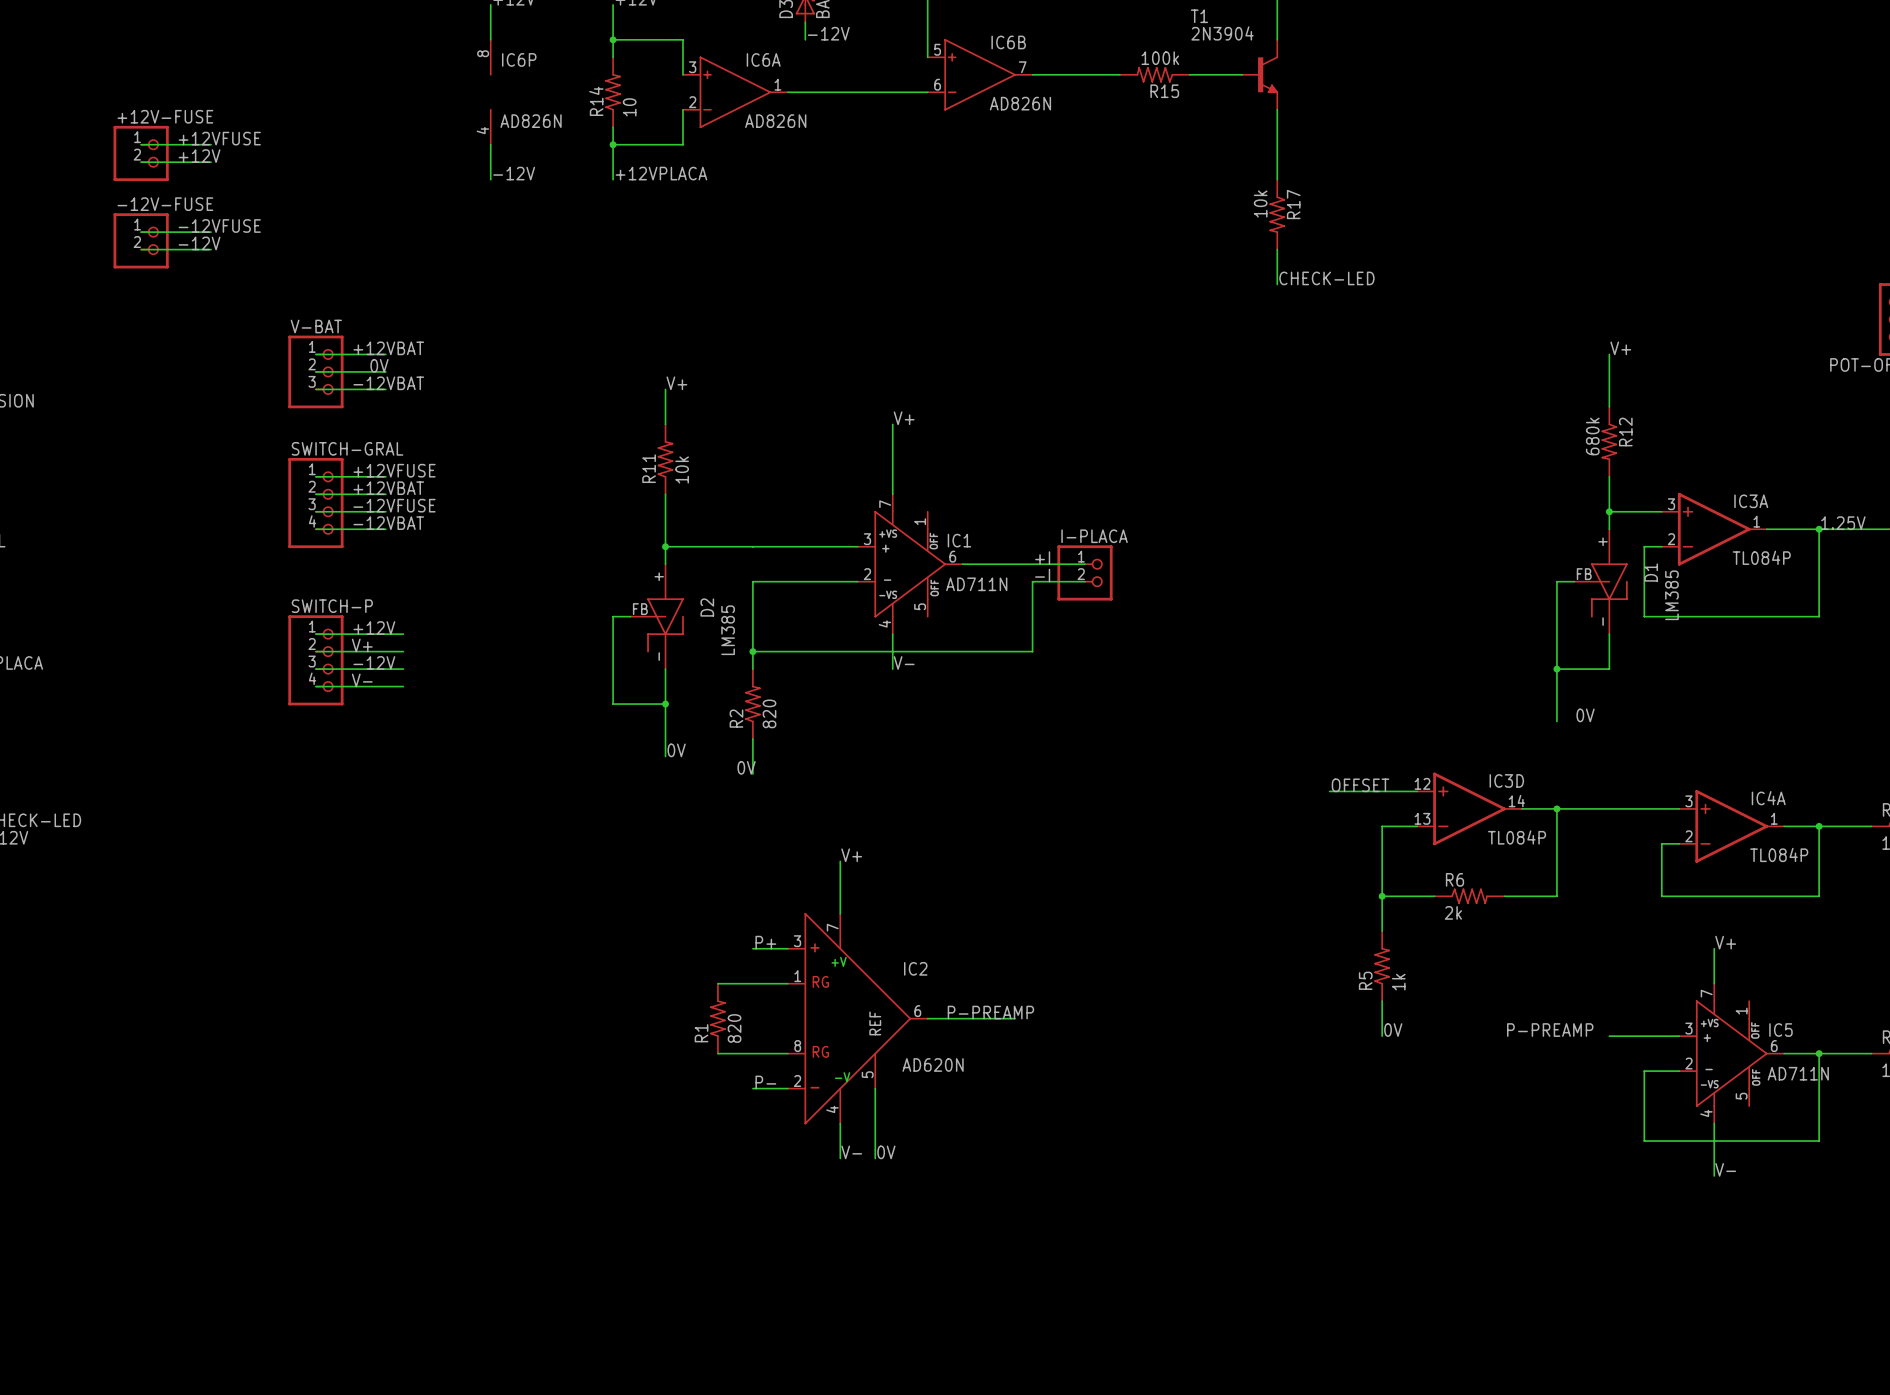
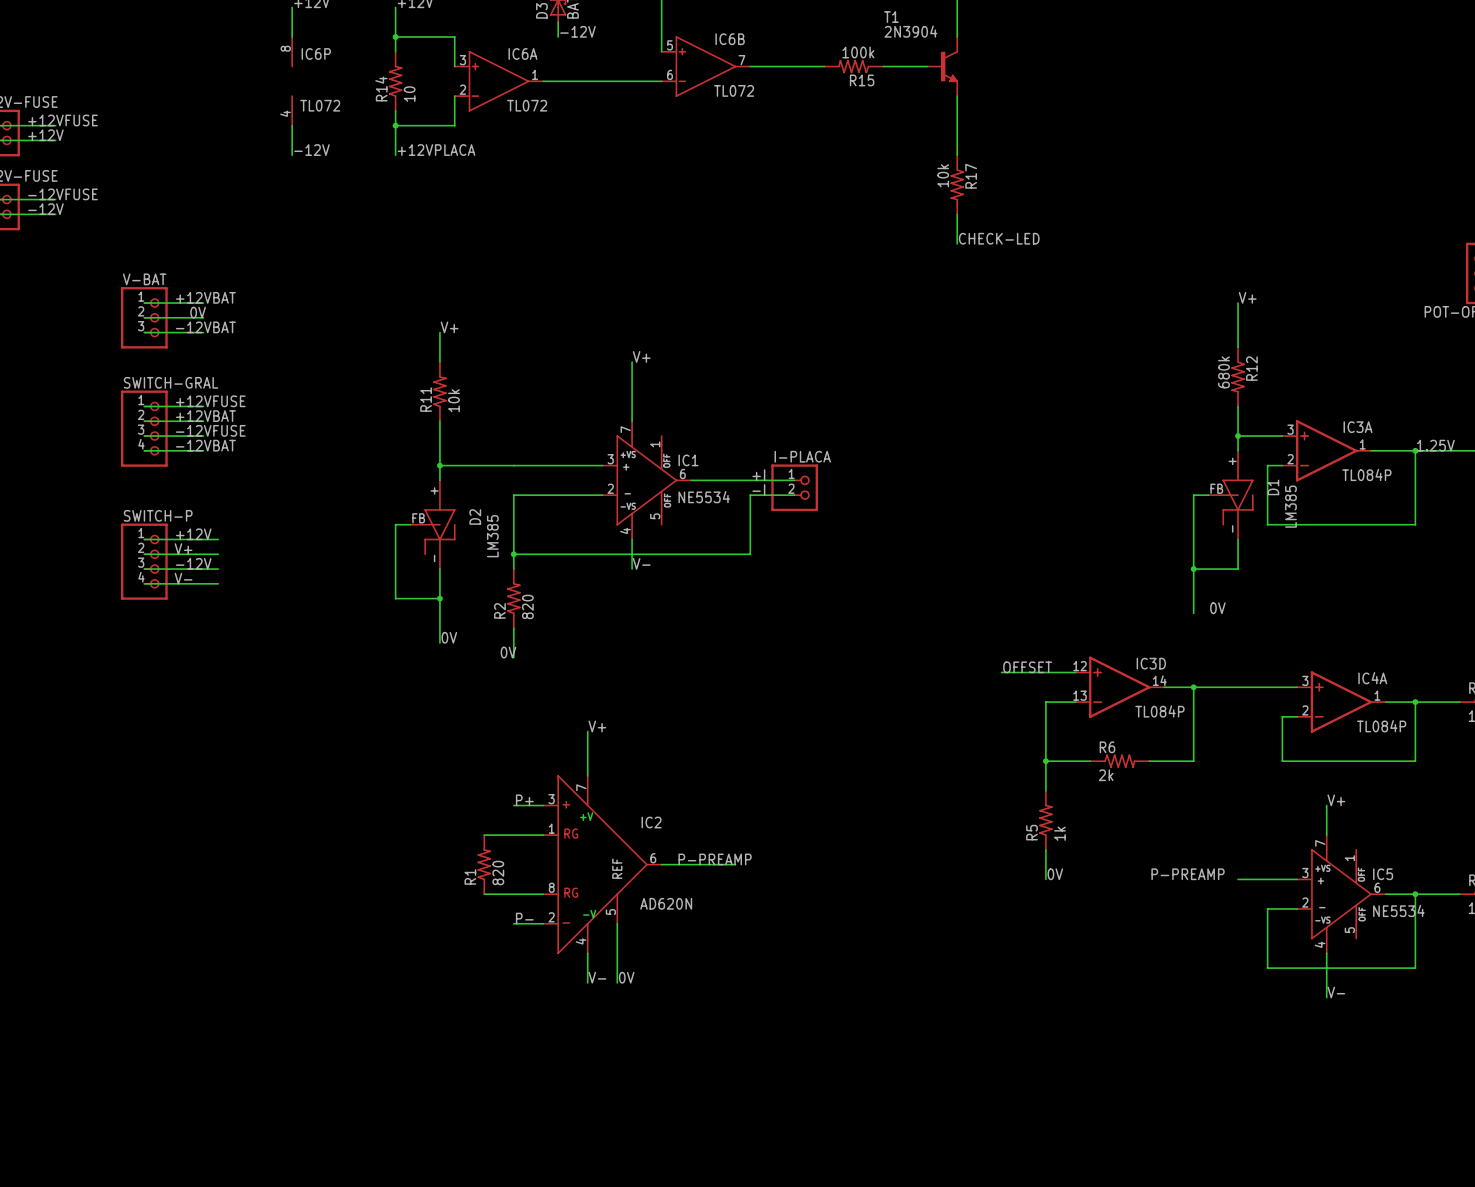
IC6B value: AD826N (1020, 103) -> TL072 (734, 90)
IC6P value: AD826N (531, 121) -> TL072 (320, 105)
IC6A value: AD826N (775, 121) -> TL072 (527, 105)
IC1 value: AD711N (976, 584) -> NE5534 (704, 497)
IC5 value: AD711N (1798, 1073) -> NE5534 (1398, 910)

